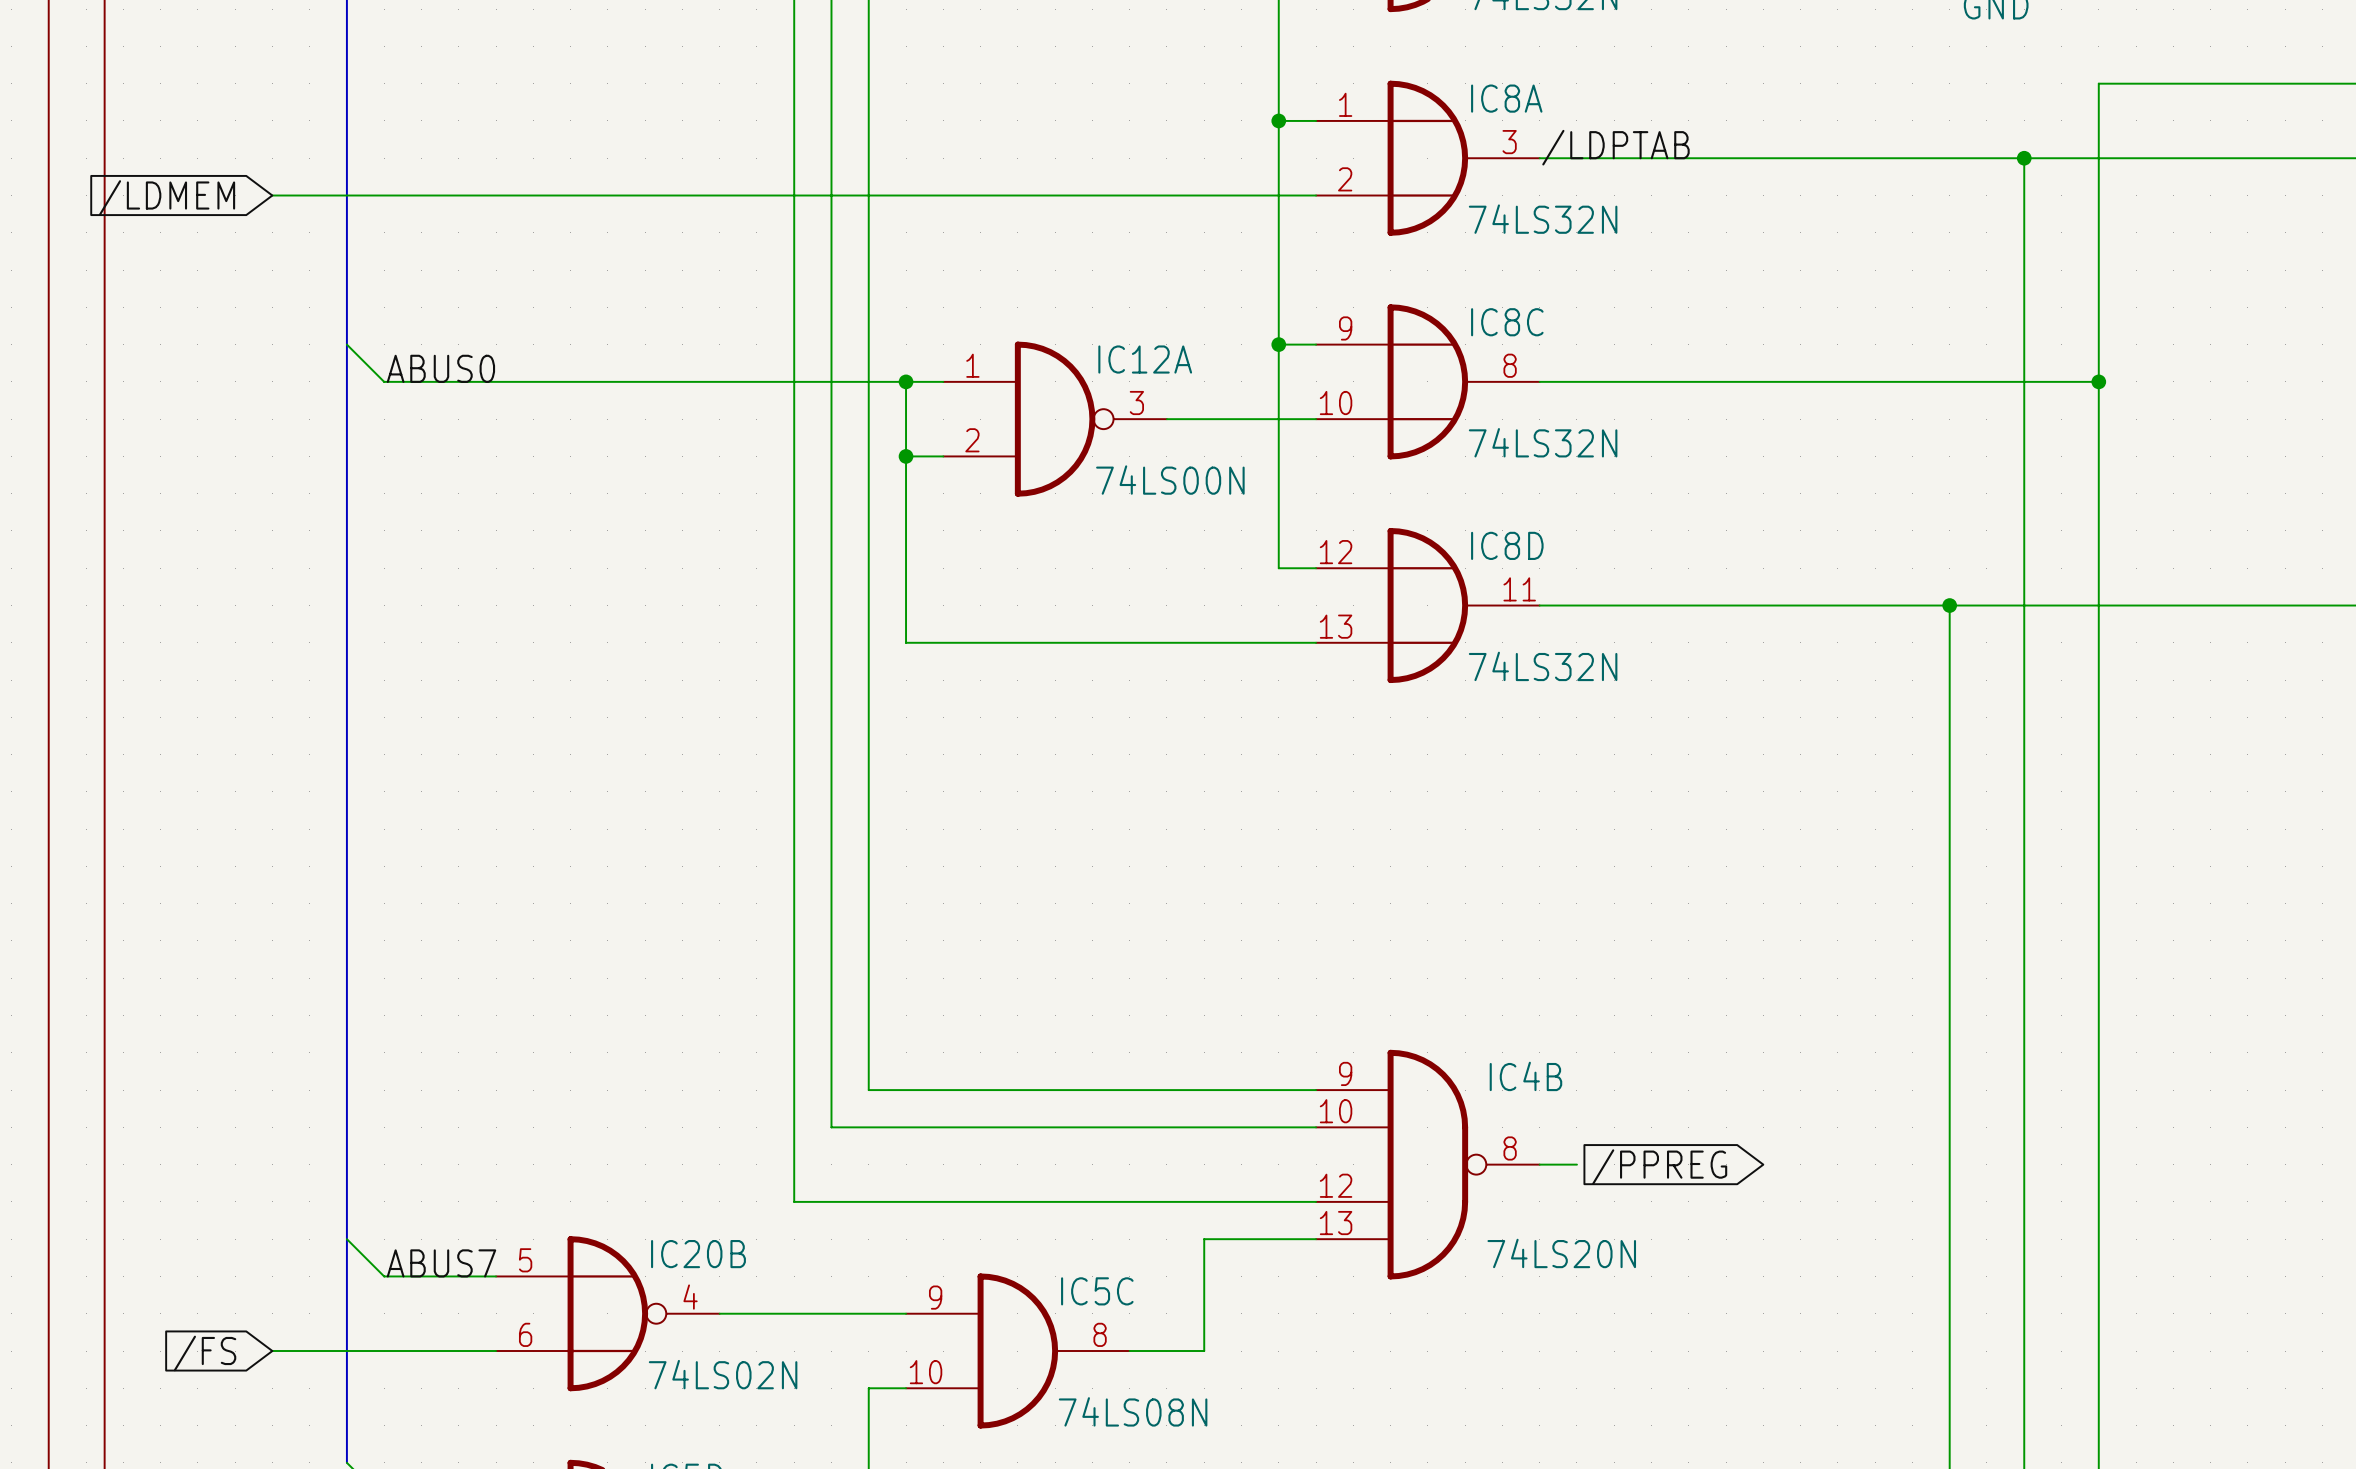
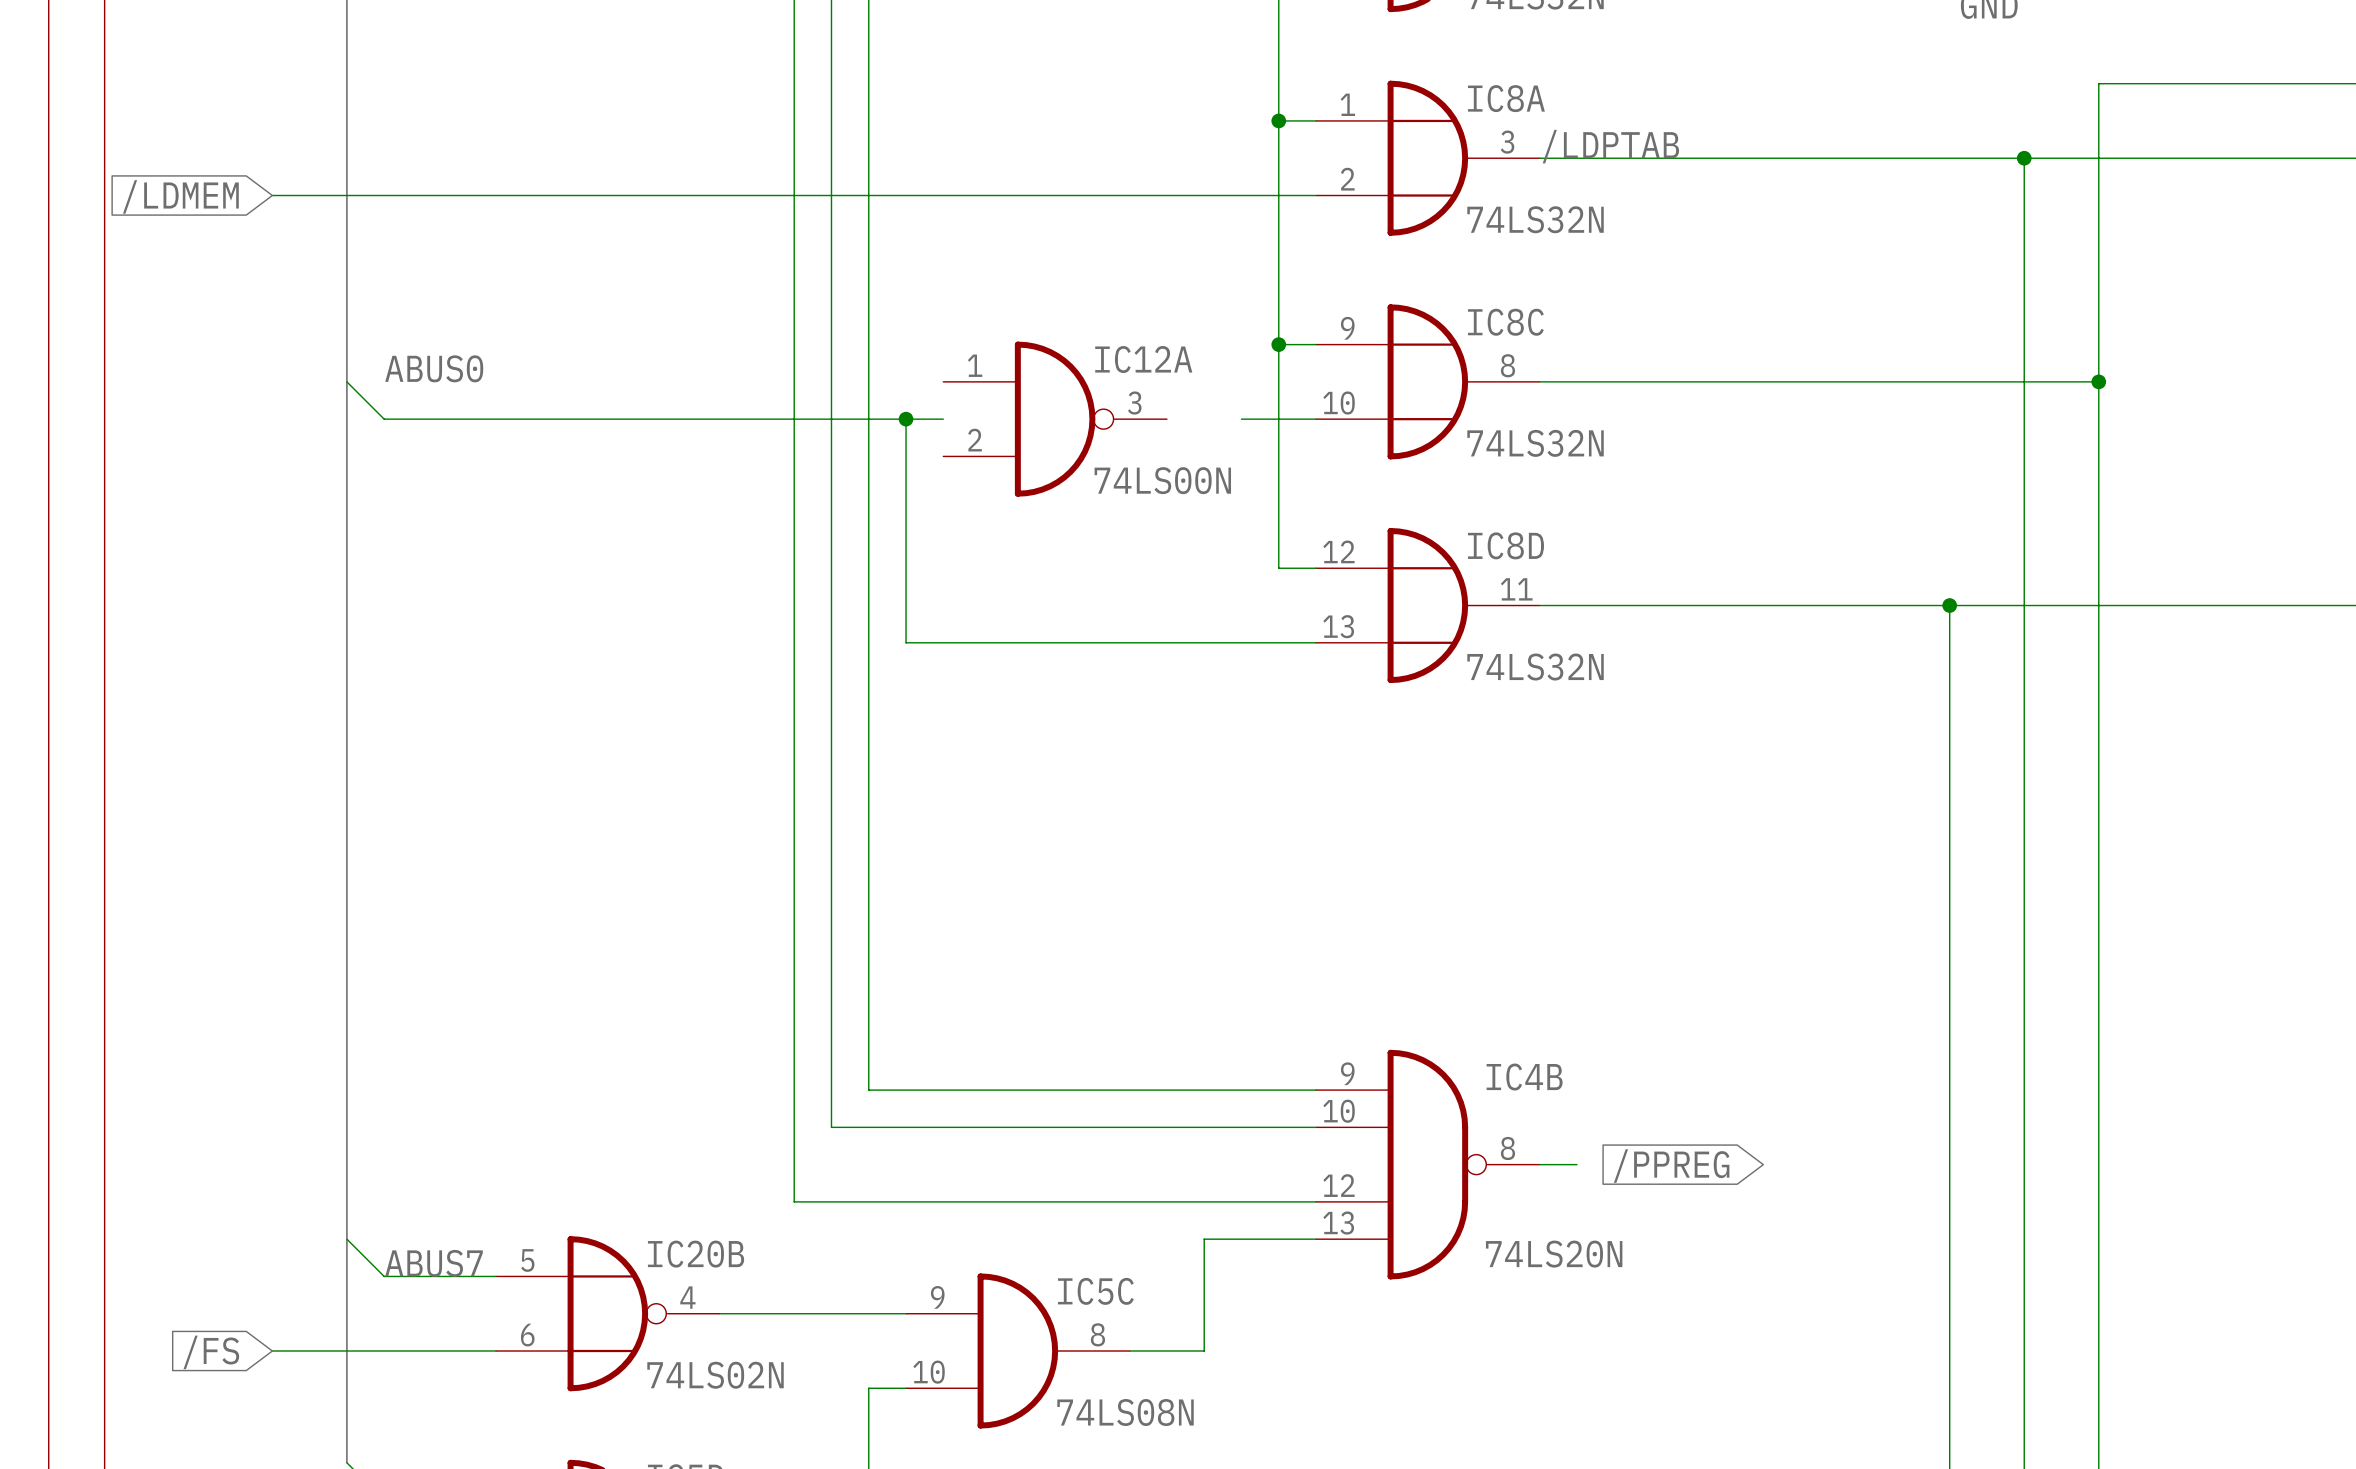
wire: (346, 344) (384, 381) (943, 381) -> (346, 381) (384, 419) (943, 419)
wire: (906, 381) (906, 419) -> none
junction: (906, 381) -> none
junction: none -> (906, 419)
wire: (1166, 419) (1241, 419) -> none
wire: (906, 456) (943, 456) -> none
junction: (906, 456) -> none

